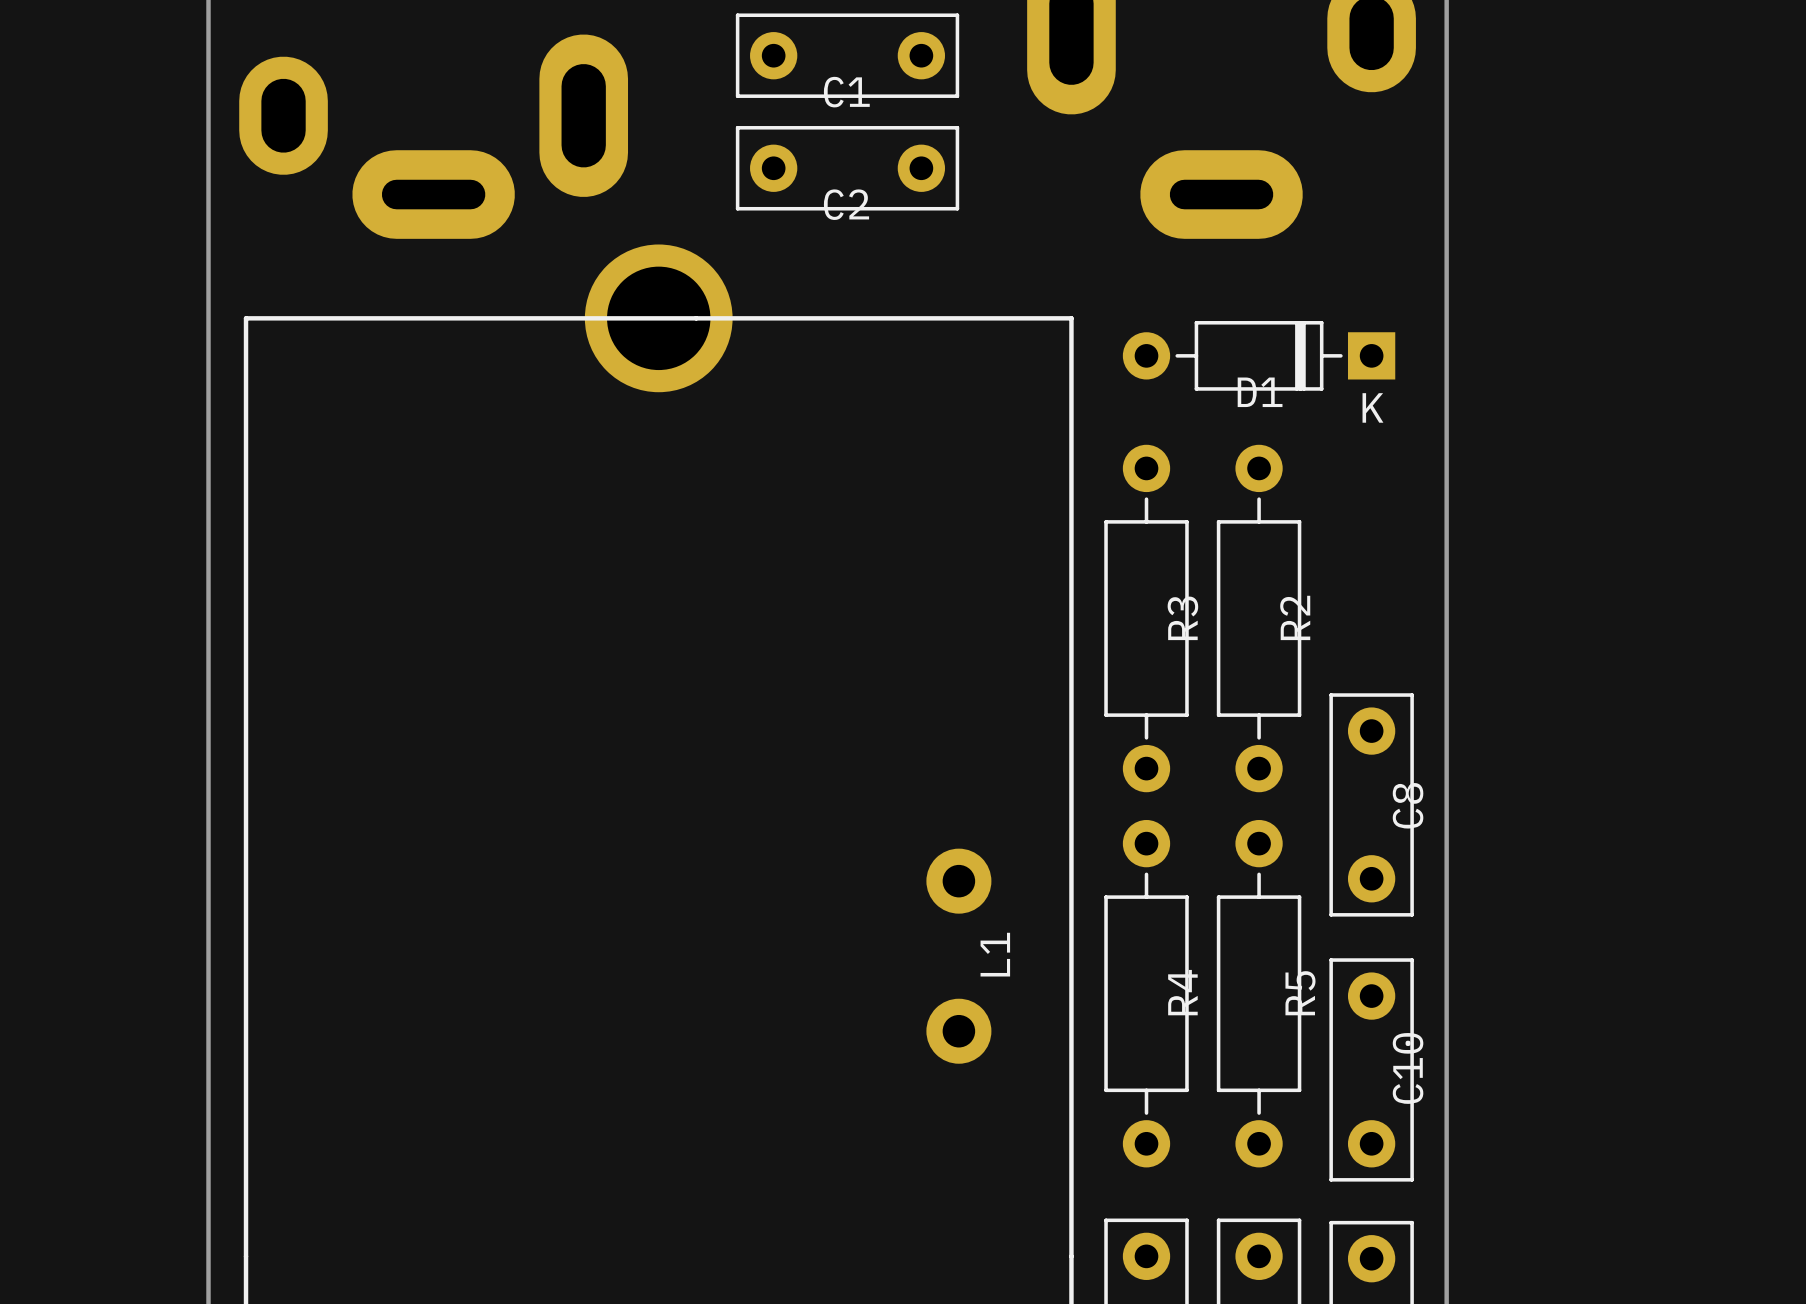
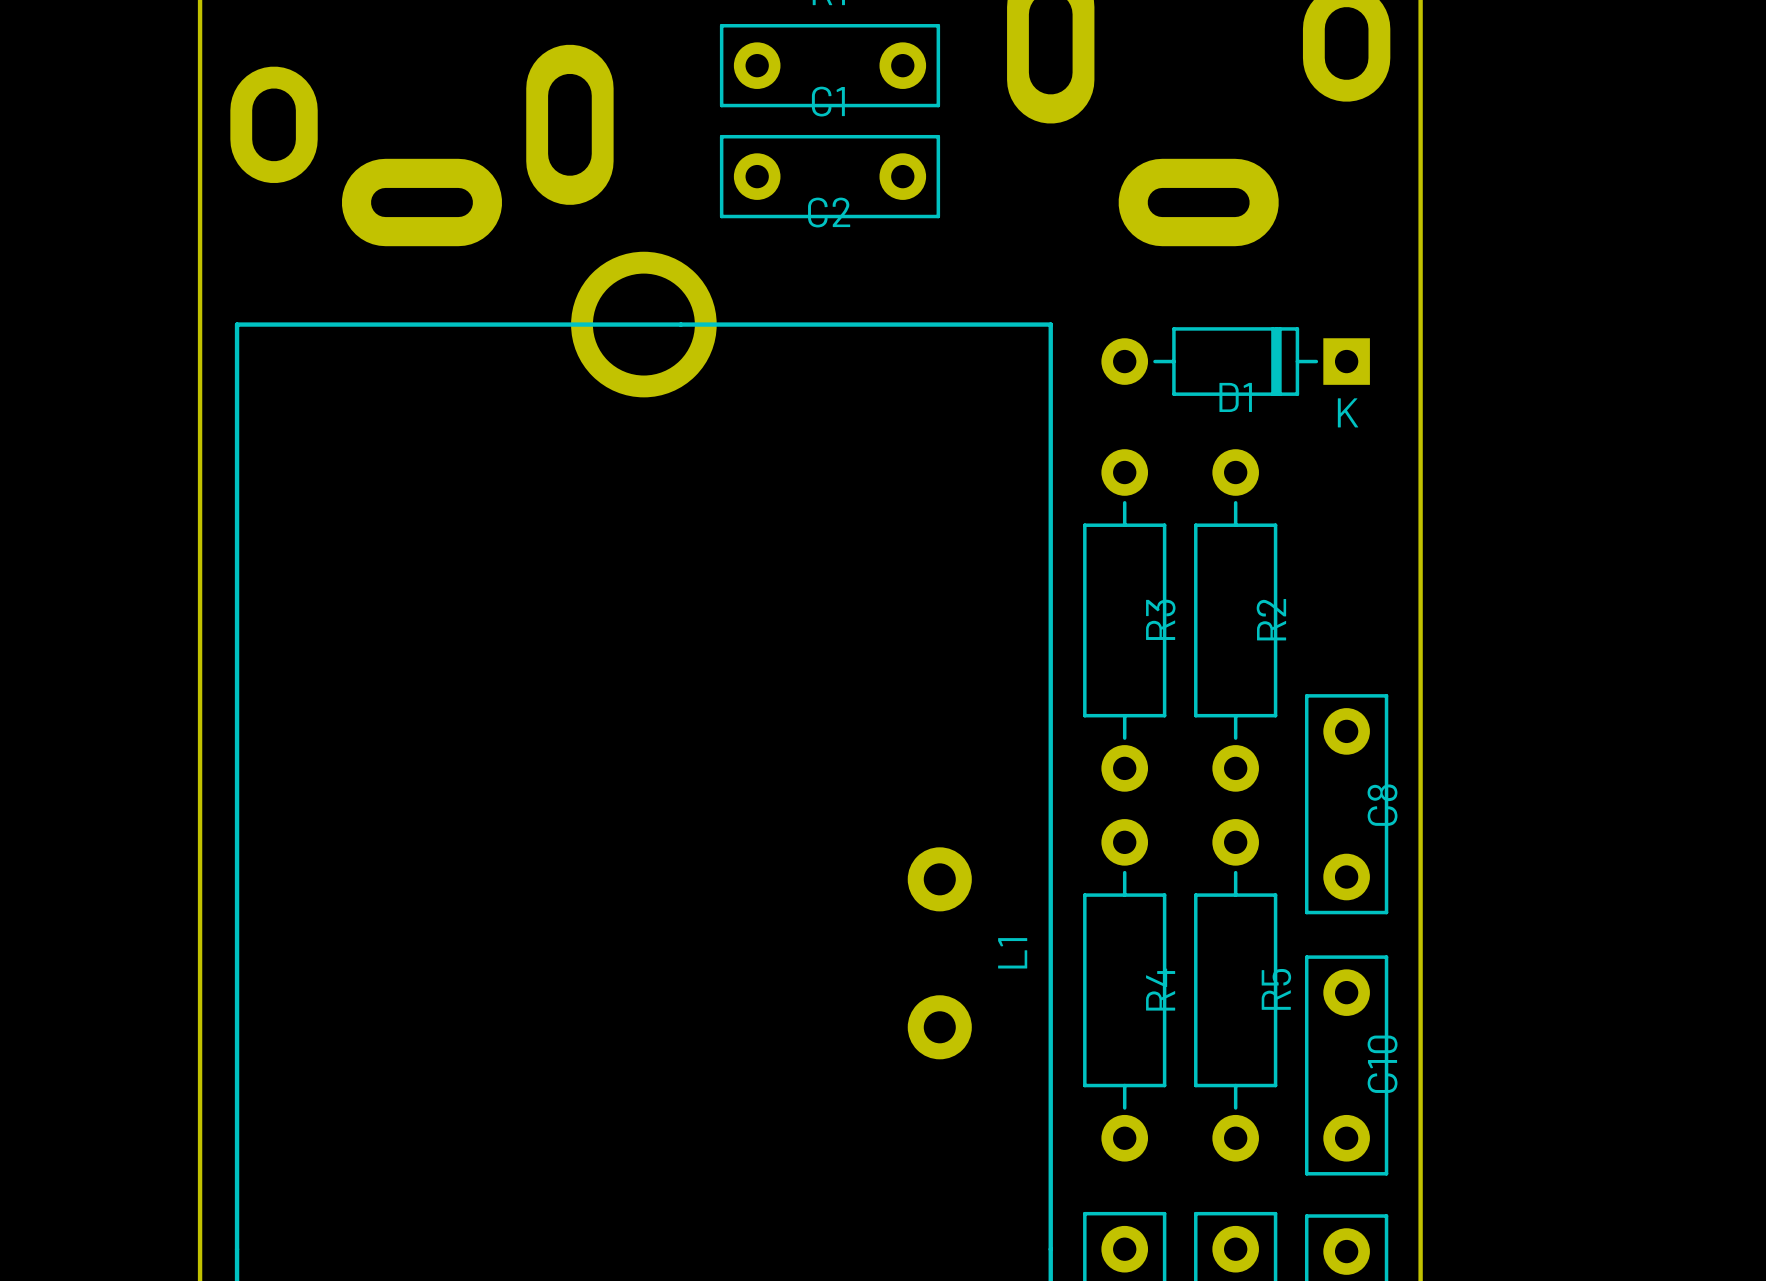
L1 name position: L1 (995, 954) -> L1 (1012, 953)

